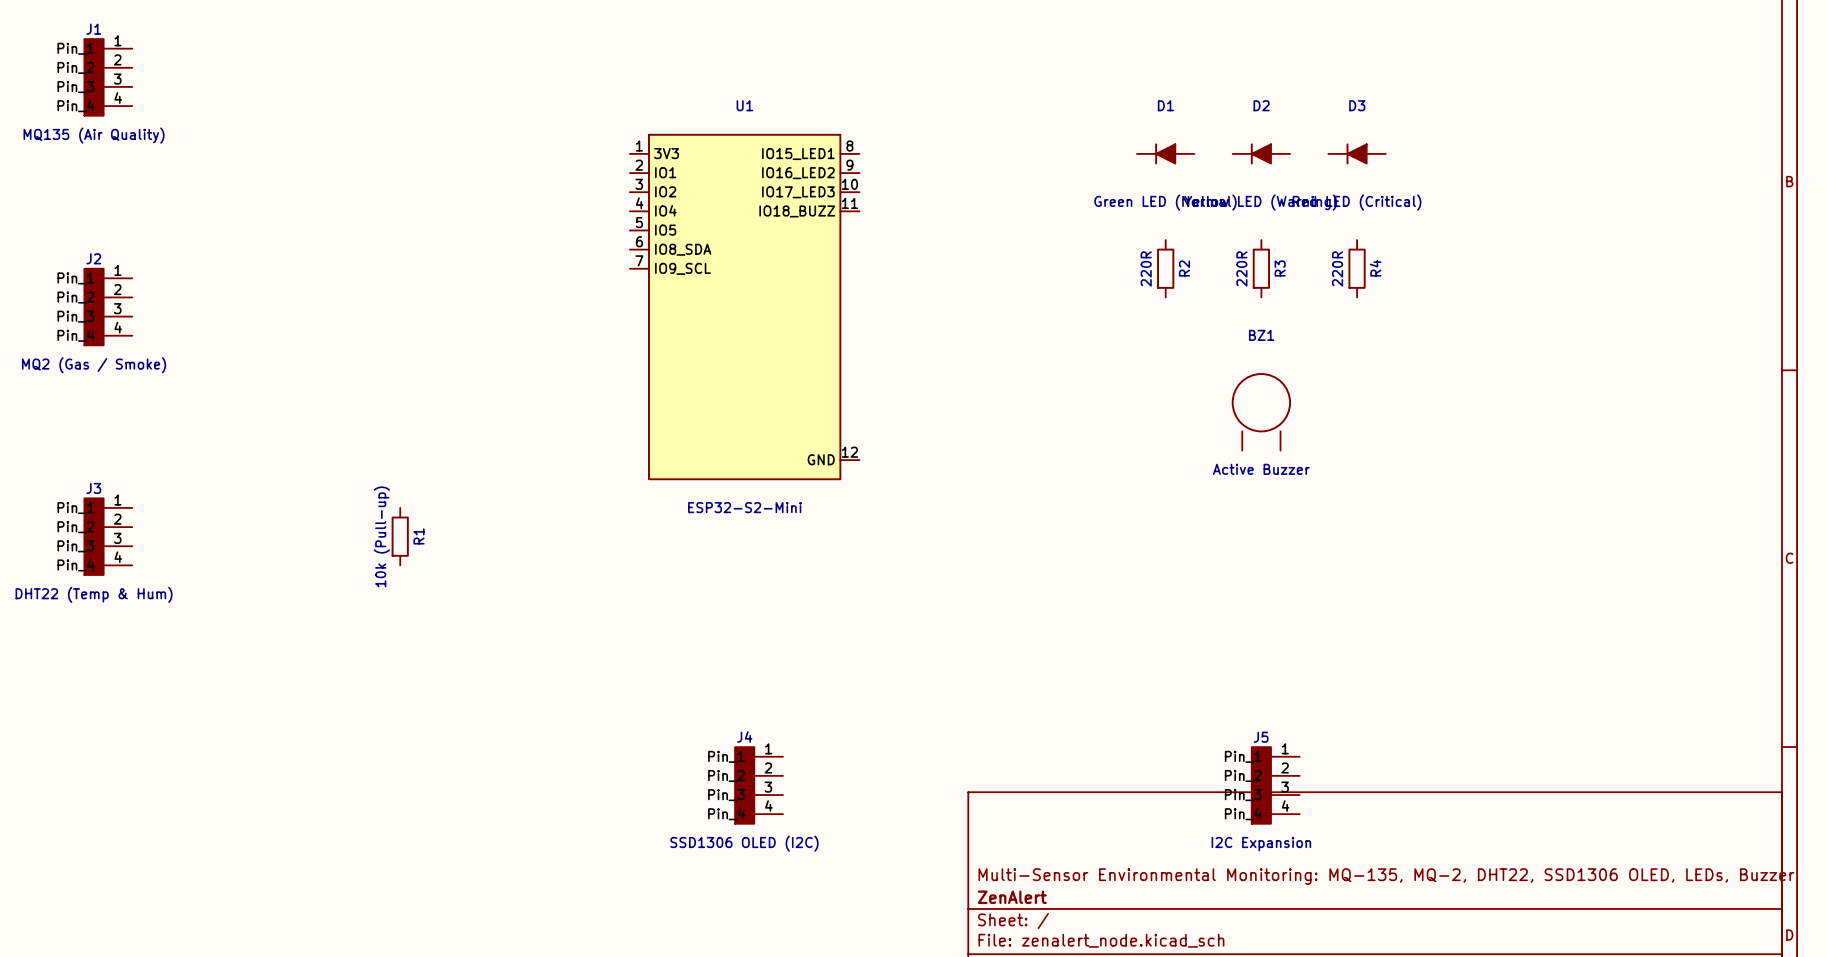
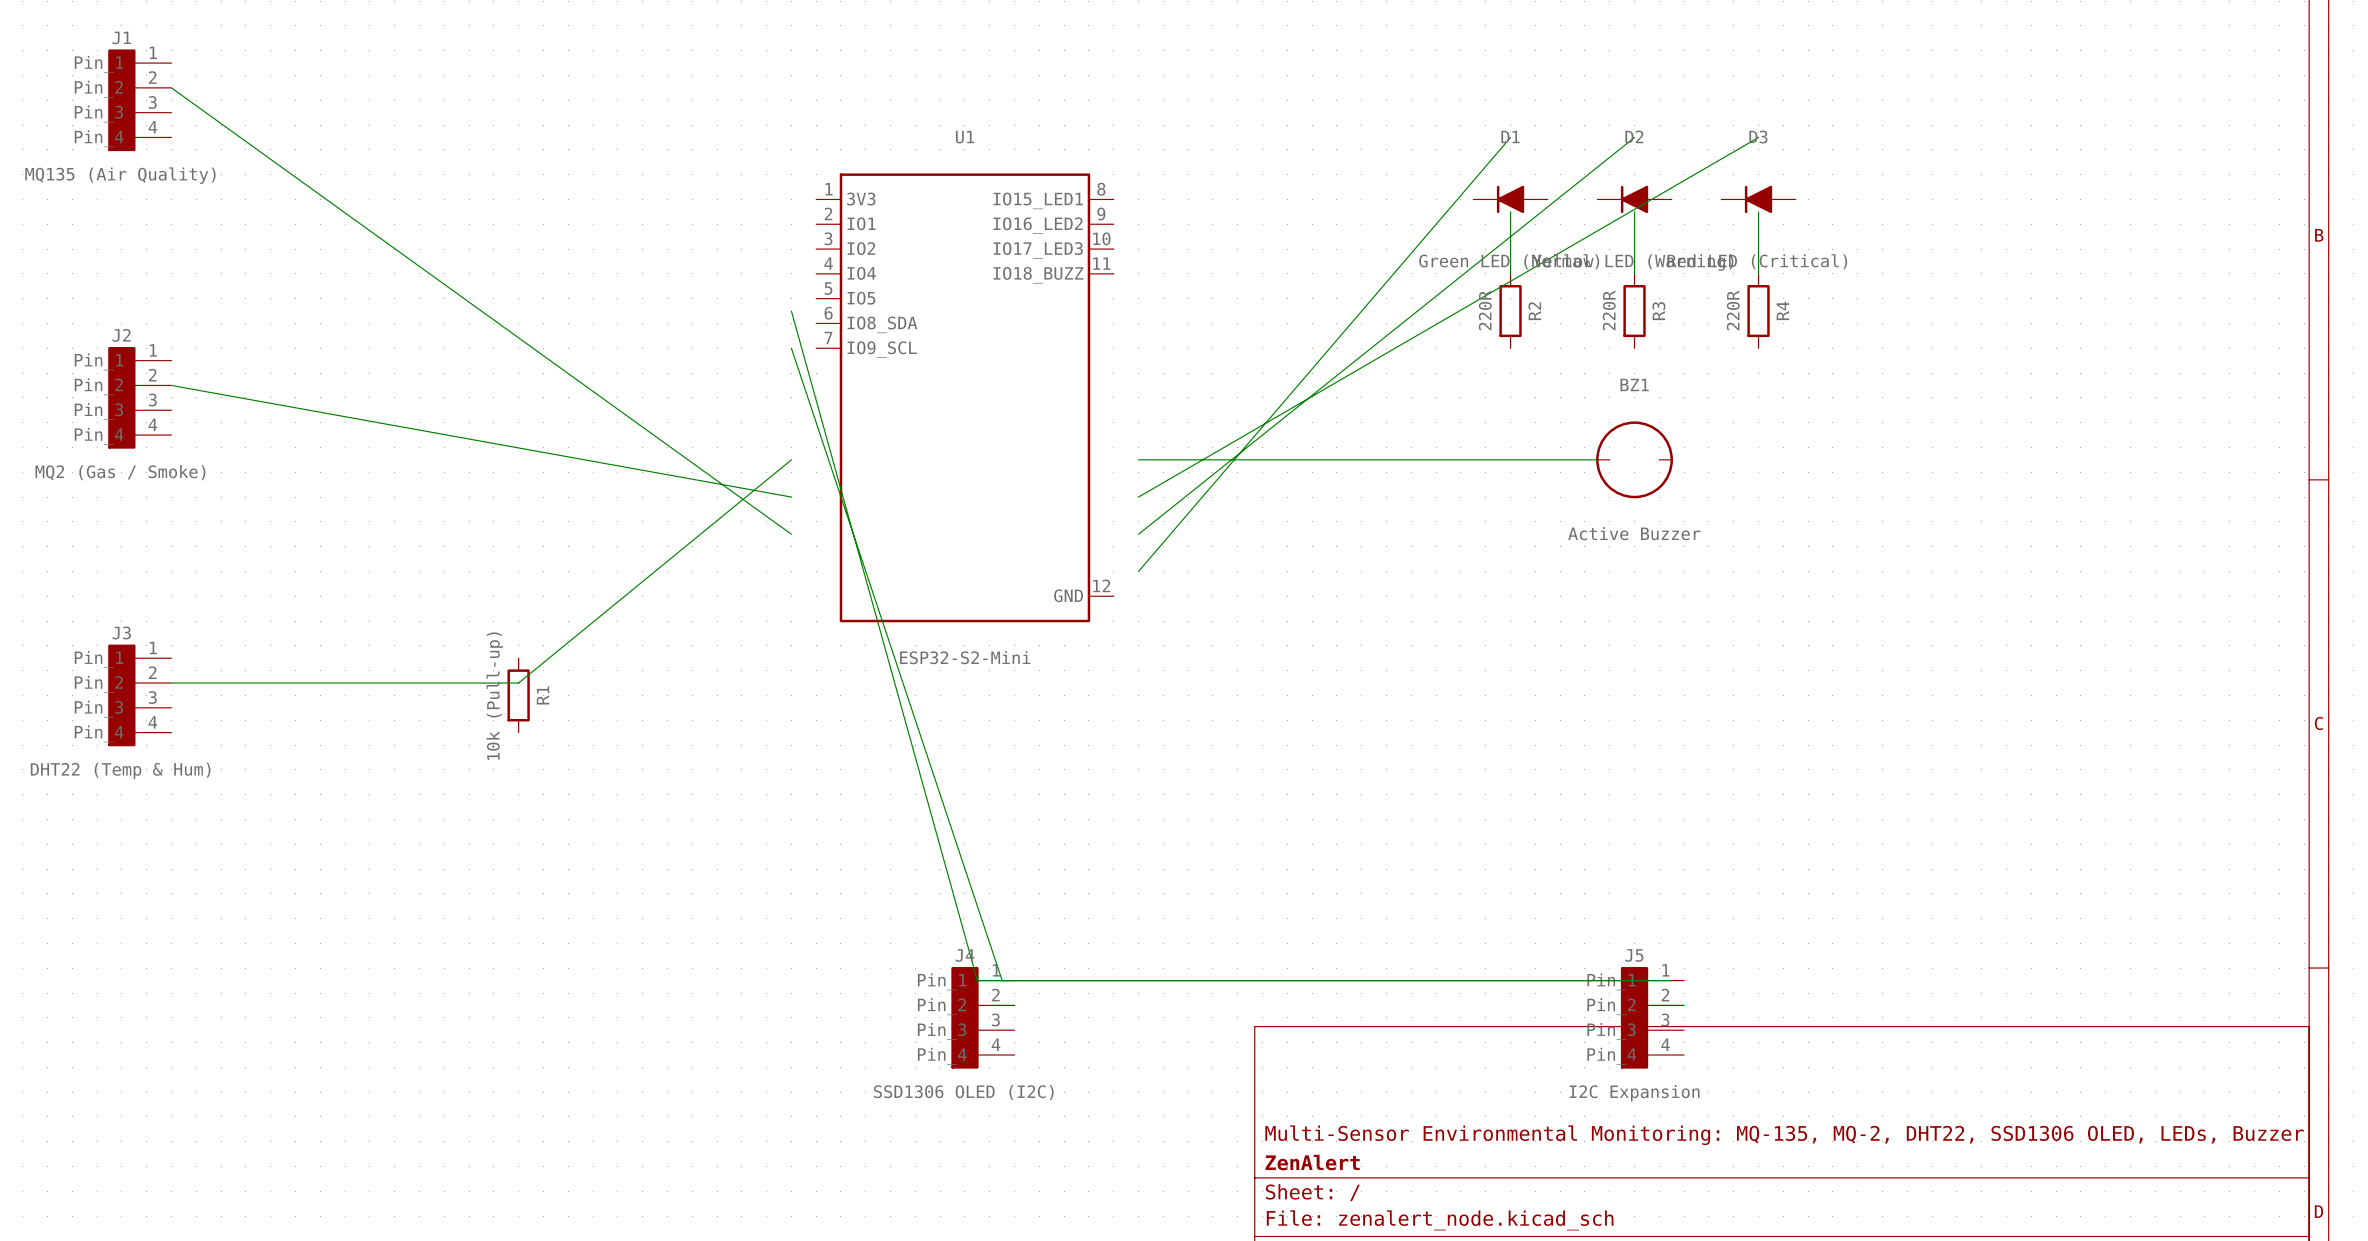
wire: none -> (171, 87) (791, 534)
wire: none -> (1510, 137) (1138, 571)
wire: none -> (1634, 137) (1138, 534)
wire: none -> (1758, 137) (1138, 497)
wire: none -> (1510, 211) (1510, 273)
wire: none -> (1634, 211) (1634, 273)
wire: none -> (1758, 211) (1758, 273)
wire: none -> (791, 311) (977, 980) (1671, 980)
wire: none -> (791, 348) (1002, 980)
R2 position: (1165, 268) -> (1510, 311)
R3 position: (1261, 268) -> (1634, 311)
R4 position: (1357, 268) -> (1758, 311)
wire: none -> (171, 385) (791, 497)
BZ1 name position: BZ1 (1261, 335) -> BZ1 (1634, 384)
wire: none -> (791, 459) (518, 683) (171, 683)
wire: none -> (1138, 459) (1597, 459)
BZ1 symbol: [1231, 373, 1292, 451] -> [1596, 421, 1673, 499]

